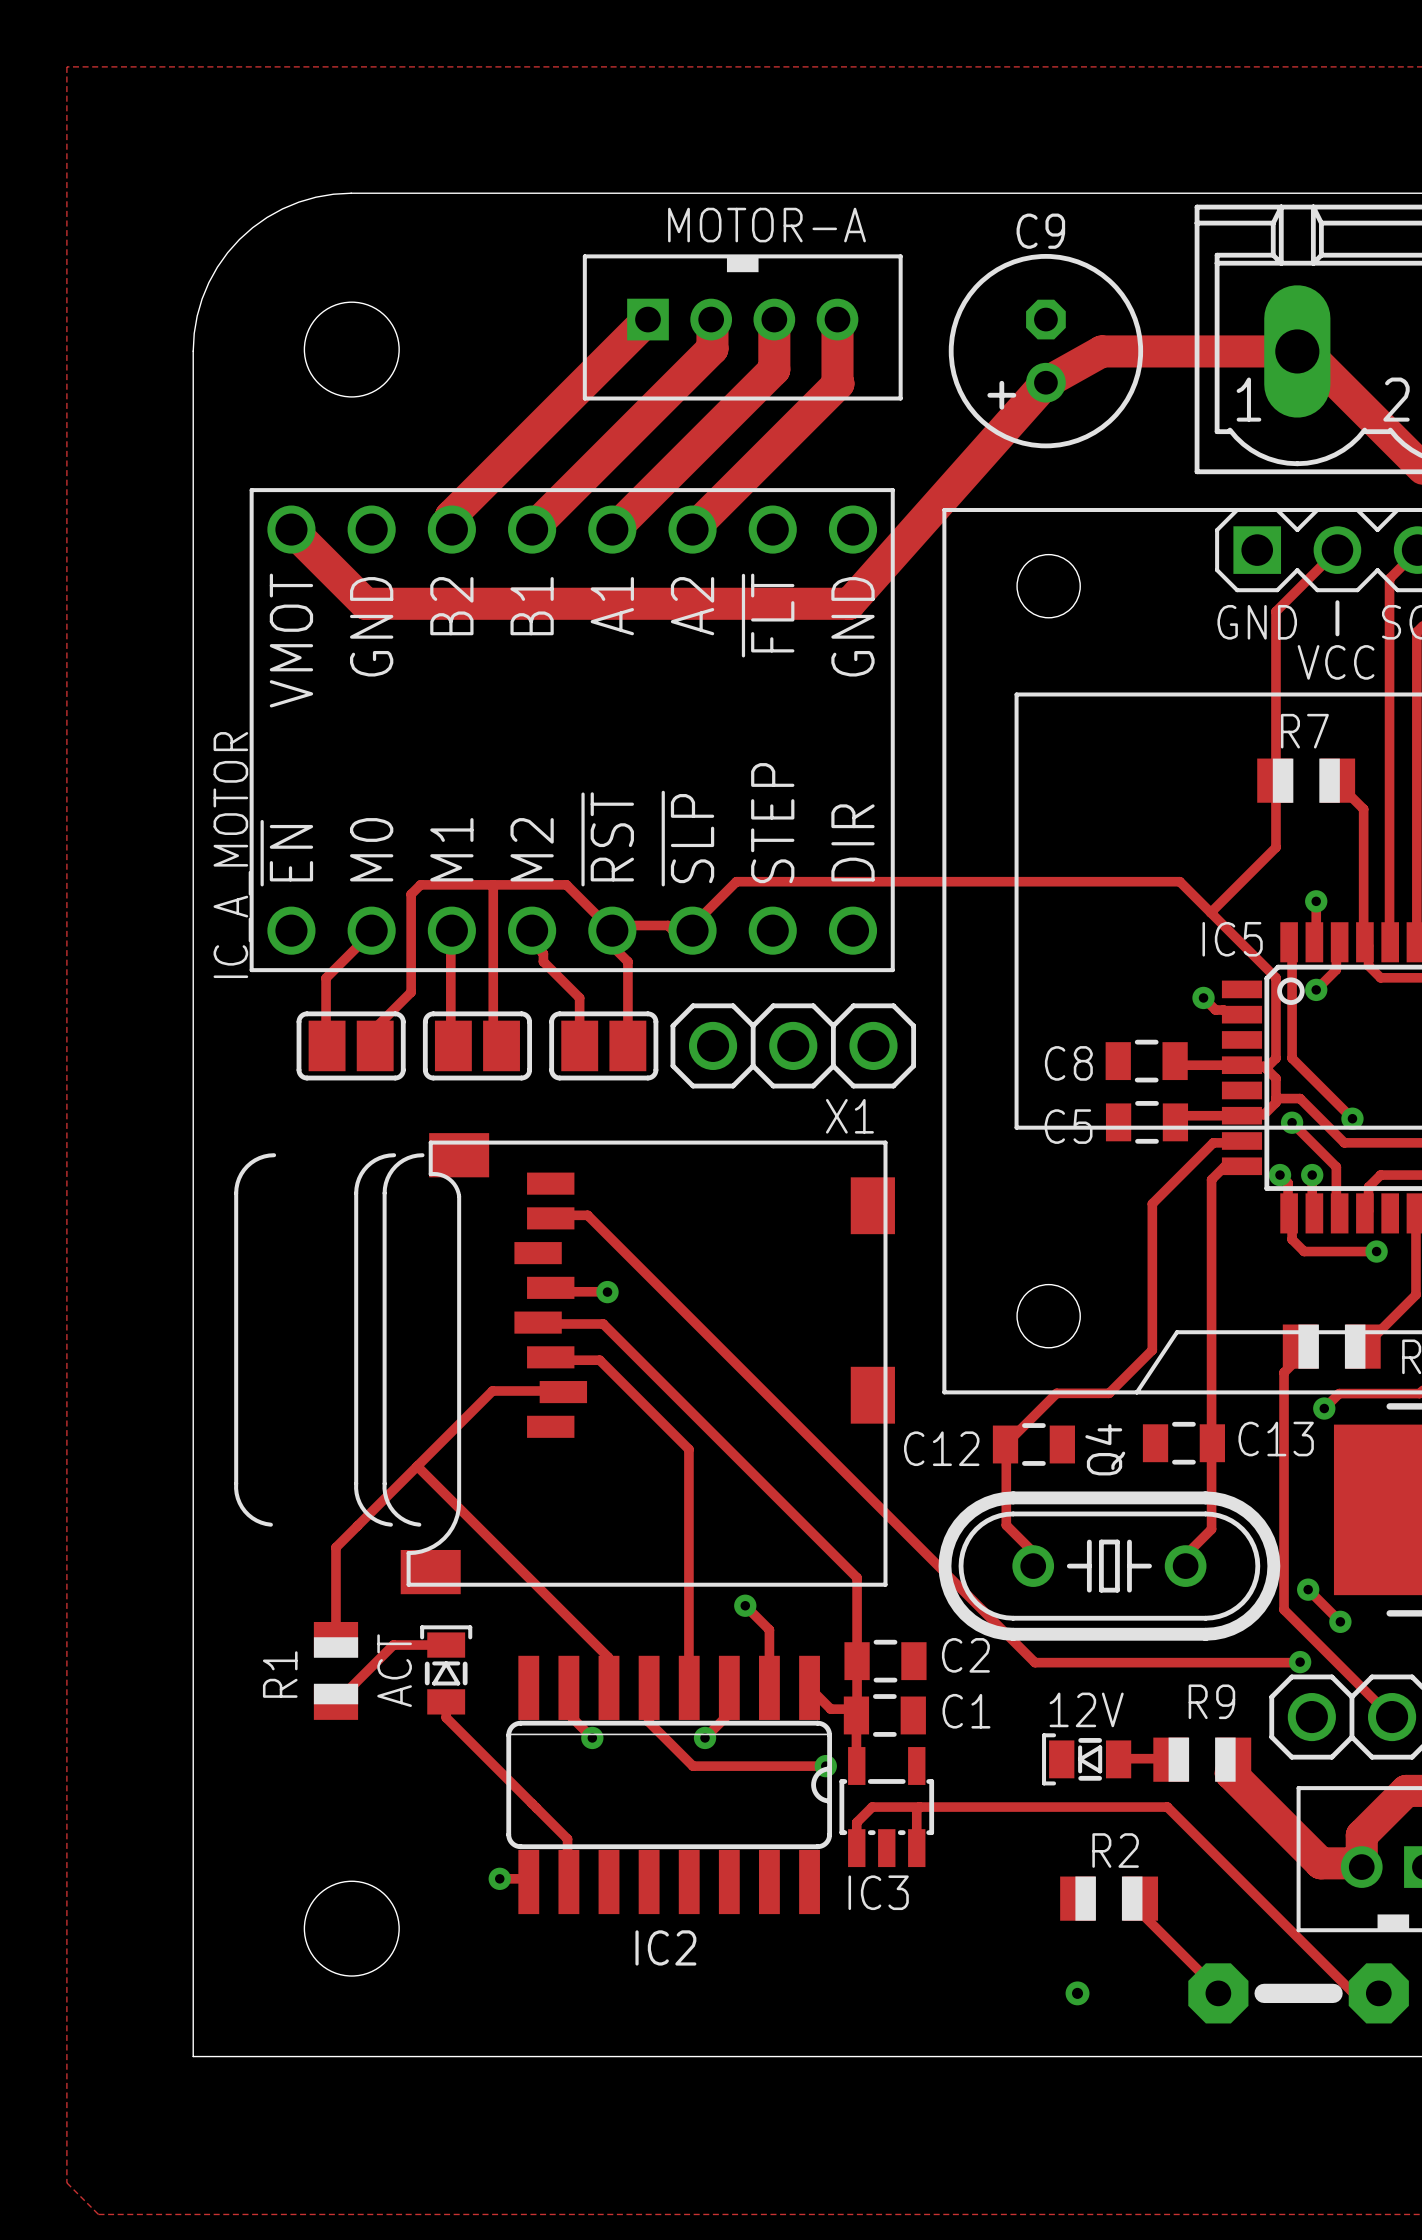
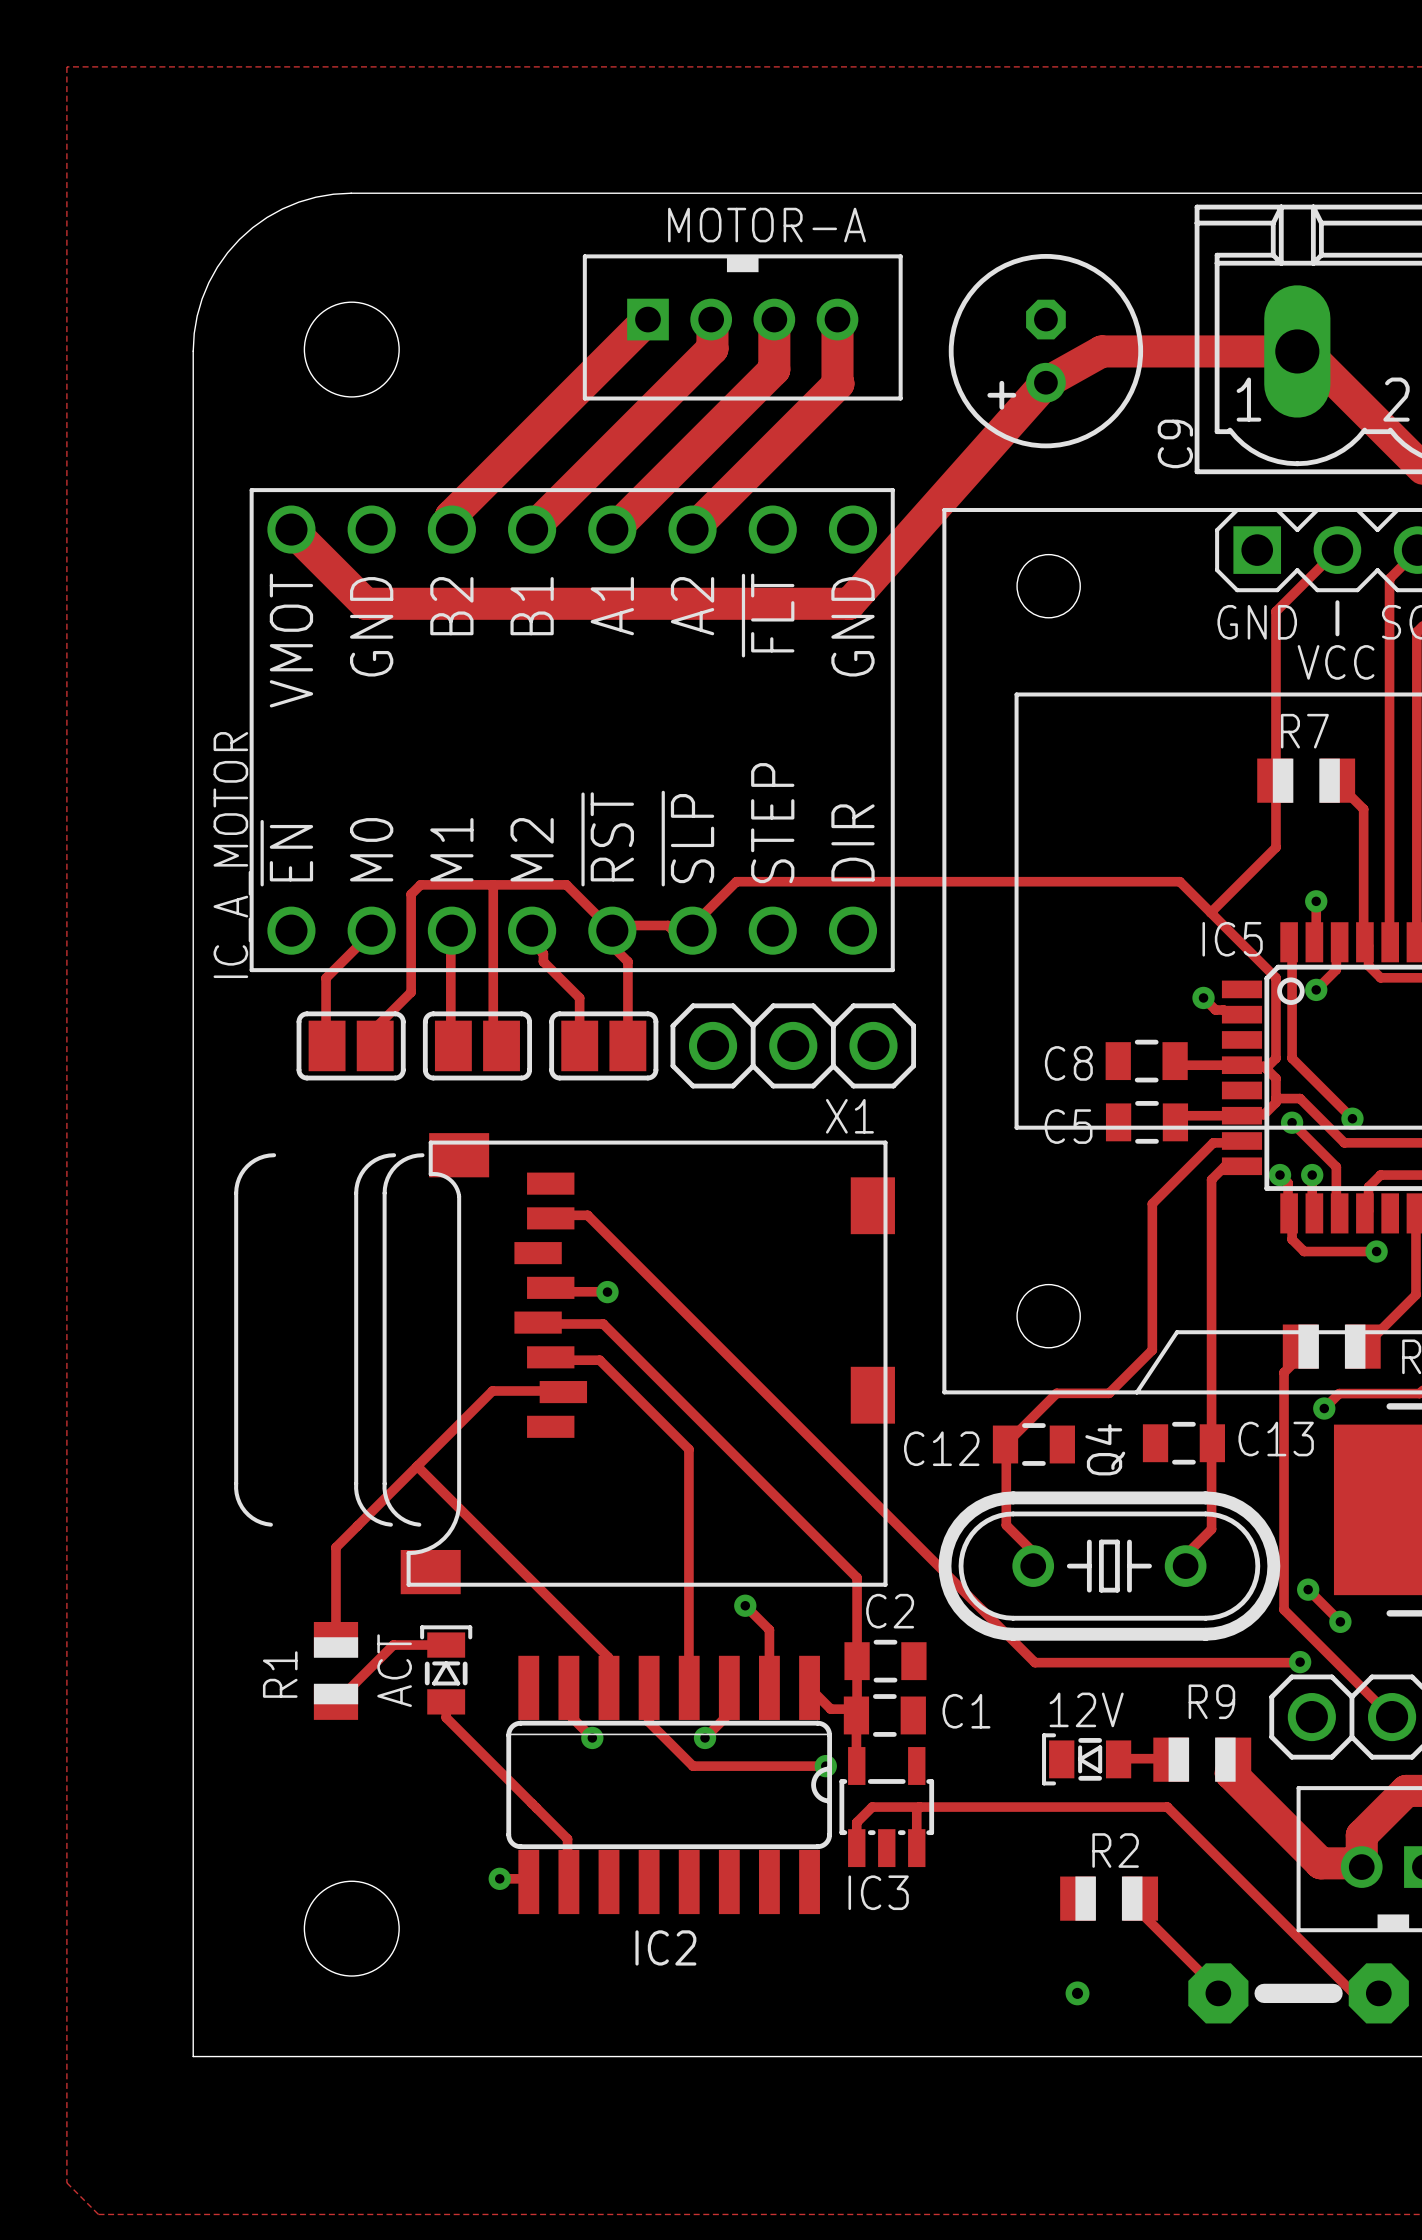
C9 name rotation: 0° (1040, 231) -> 90° counterclockwise (1175, 443)
C9 name position: C9 (1040, 231) -> C9 (1175, 443)
C2 name position: C2 (965, 1655) -> C2 (890, 1611)

